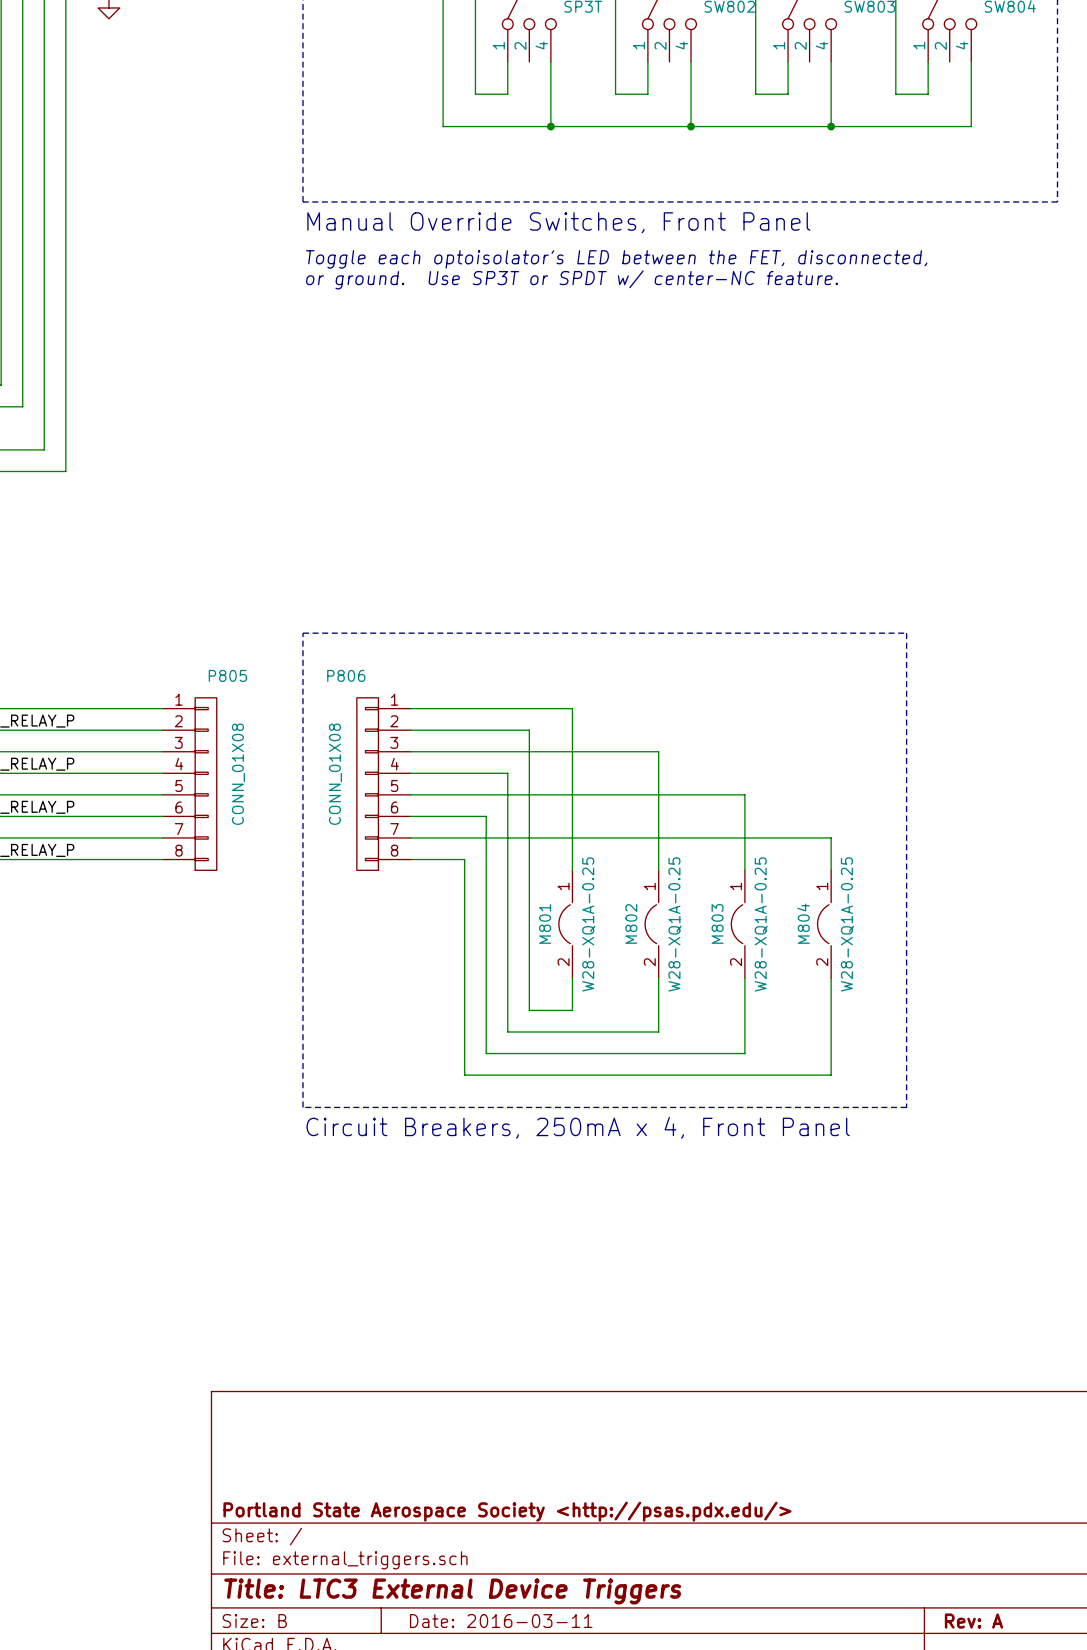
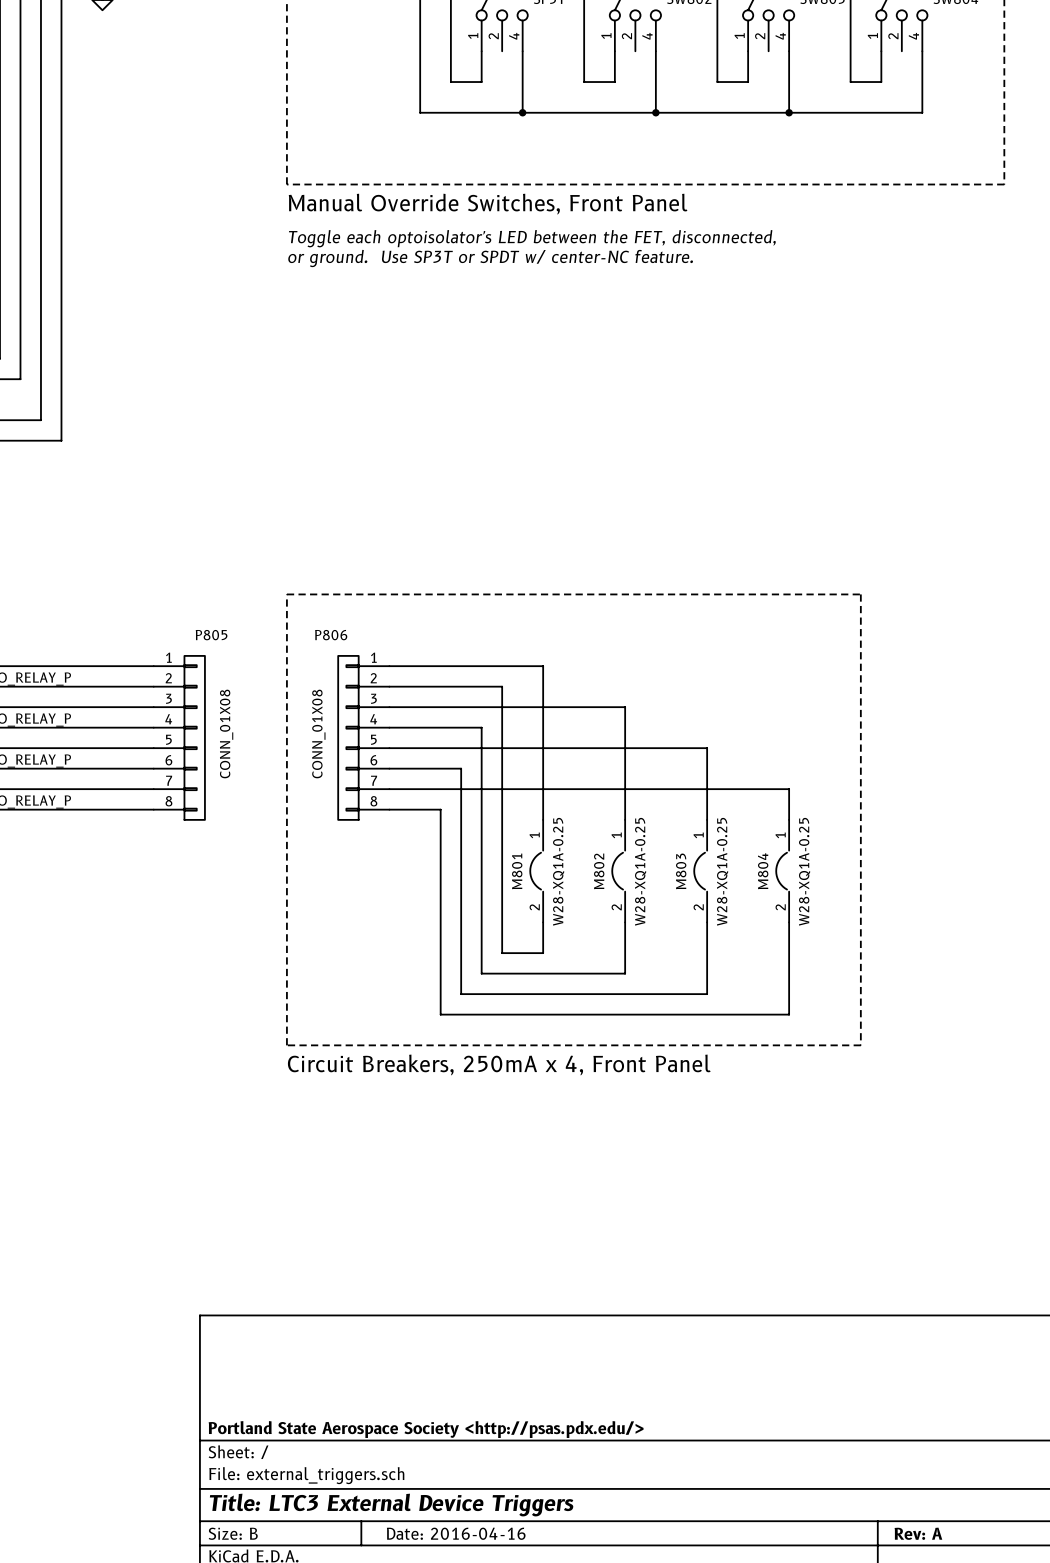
title block: Date: 2016-03-11 (501, 1621) -> Date: 2016-04-16 (456, 1533)

